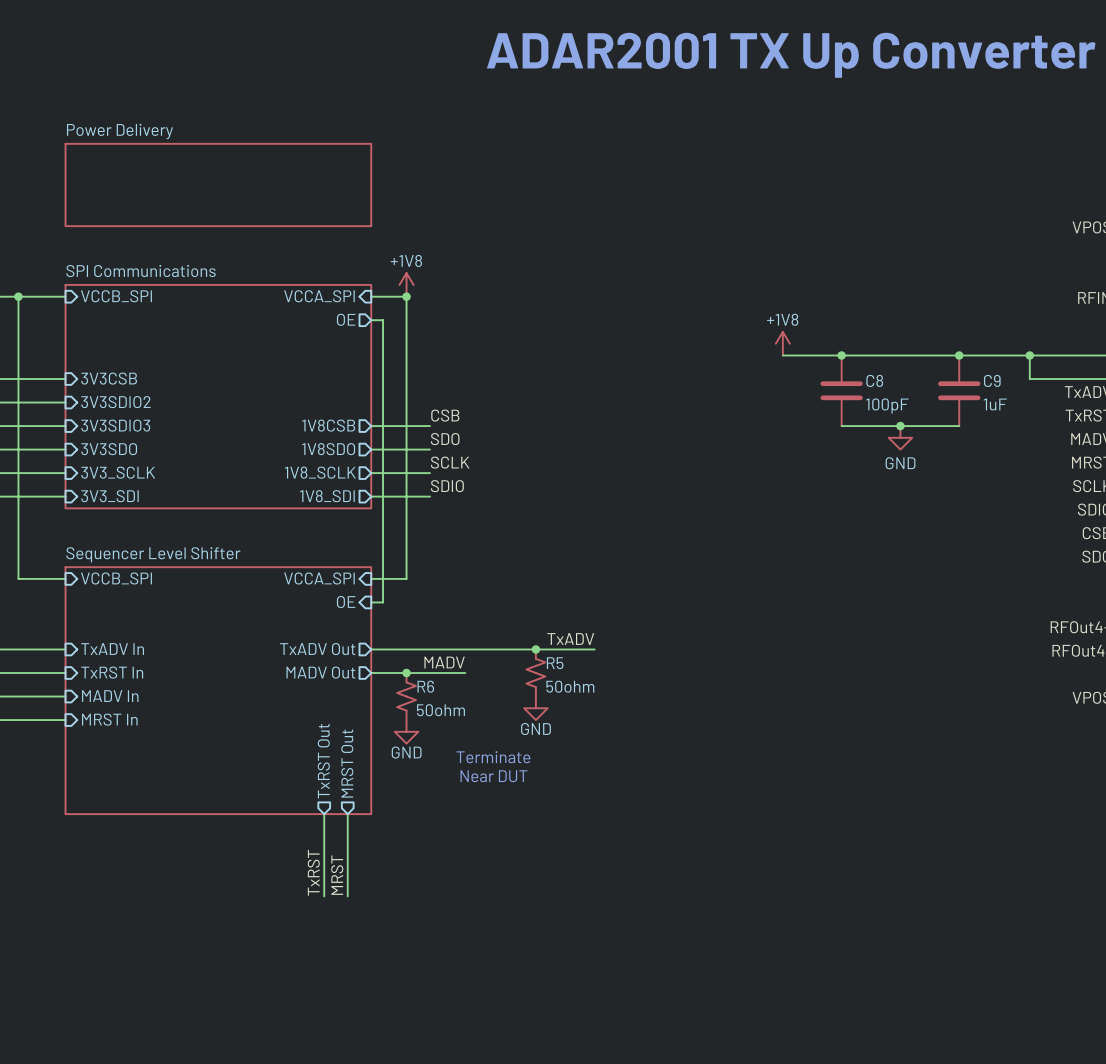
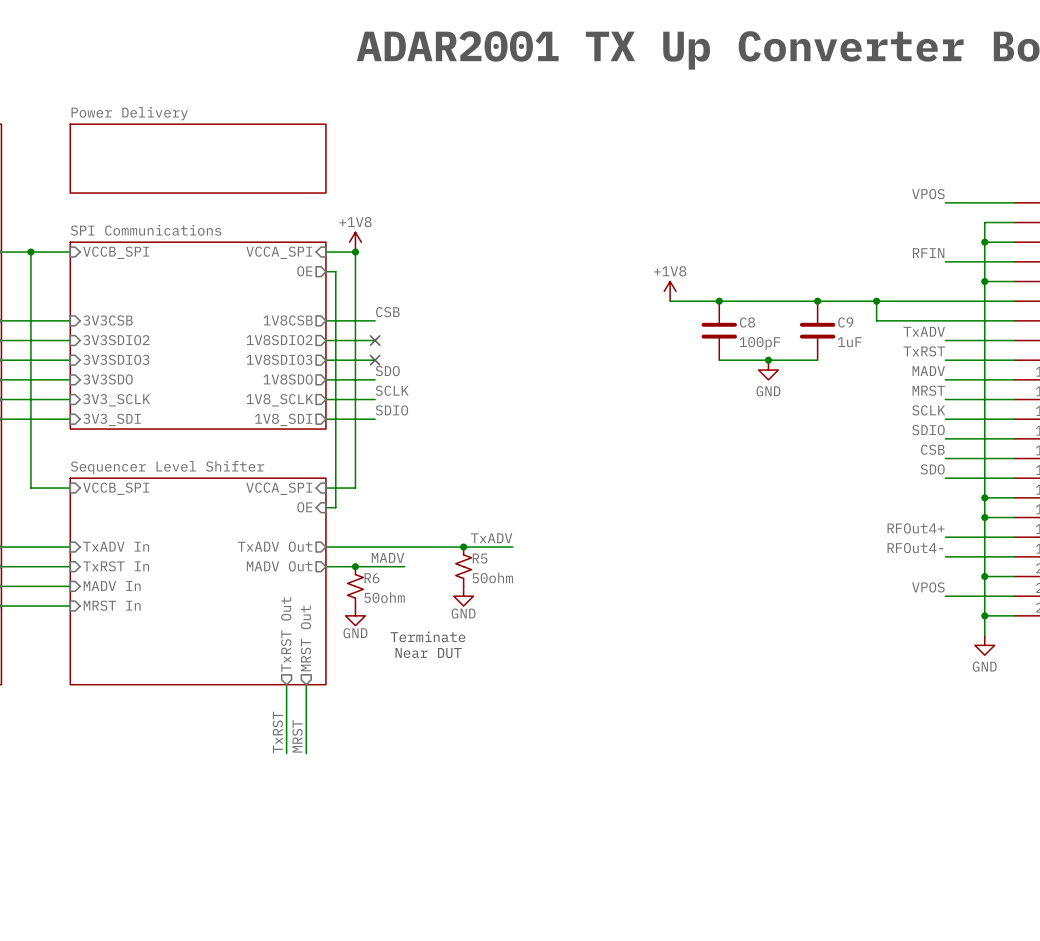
sheet pin: none -> 1V8CSB (288, 320)
wire: none -> (325, 320) (375, 320)
sheet pin: none -> 1V8SDIO2 (279, 340)
wire: none -> (325, 340) (375, 340)
no-connect mark: none -> (375, 340)
label position: CSB (445, 415) -> CSB (387, 312)
sheet pin: 1V8CSB (328, 425) -> 1V8SDIO3 (279, 359)
no-connect mark: none -> (375, 360)

